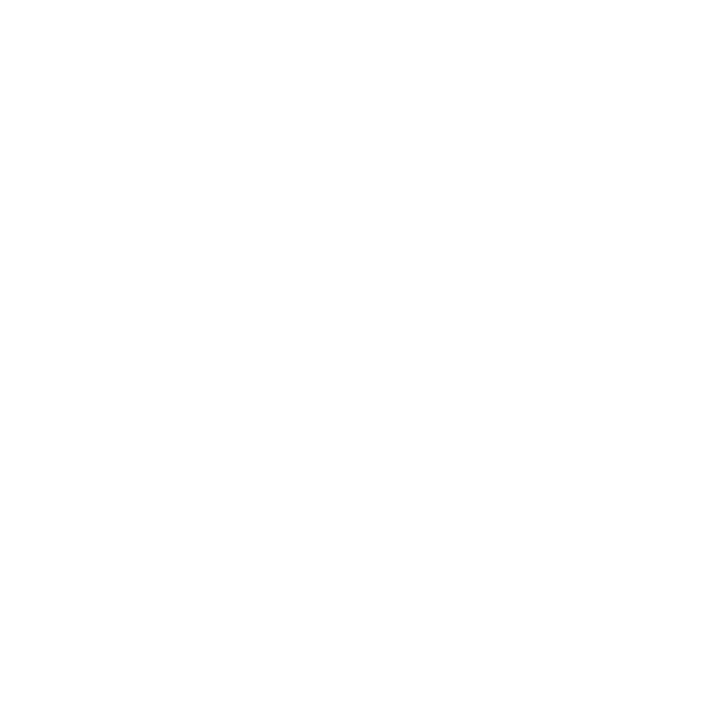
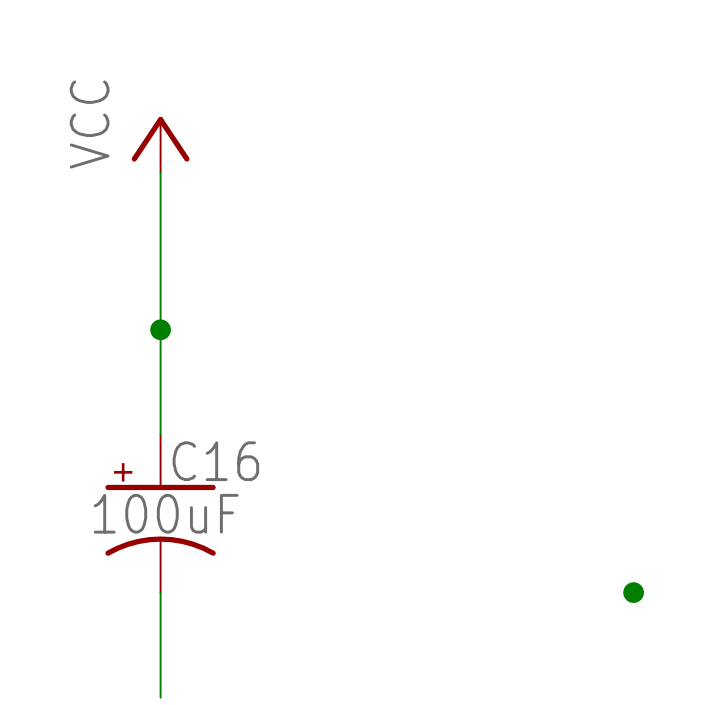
power symbol: none -> VCC (160, 144)
wire: none -> (160, 172) (160, 434)
junction: none -> (160, 329)
C16: none -> 100uF (160, 513)
wire: none -> (160, 592) (160, 697)
junction: none -> (633, 592)

